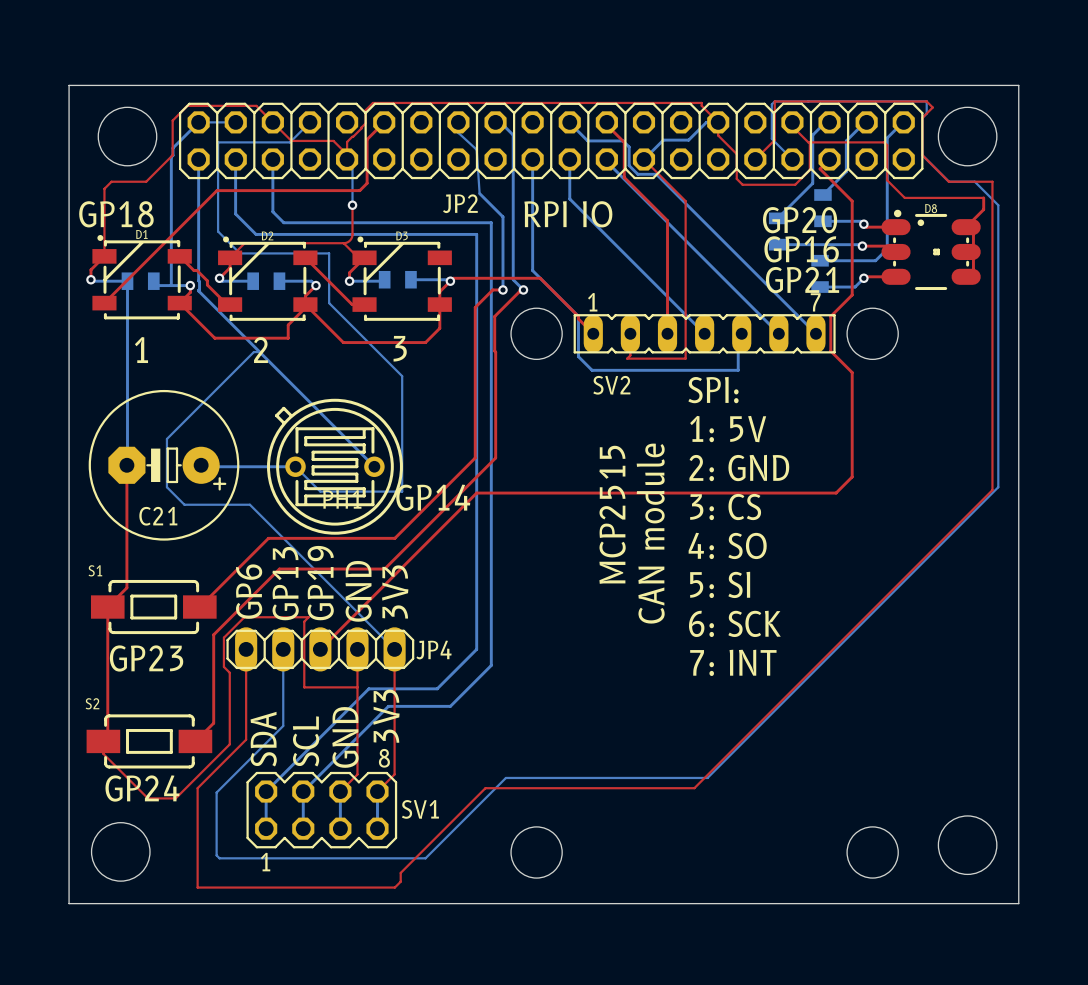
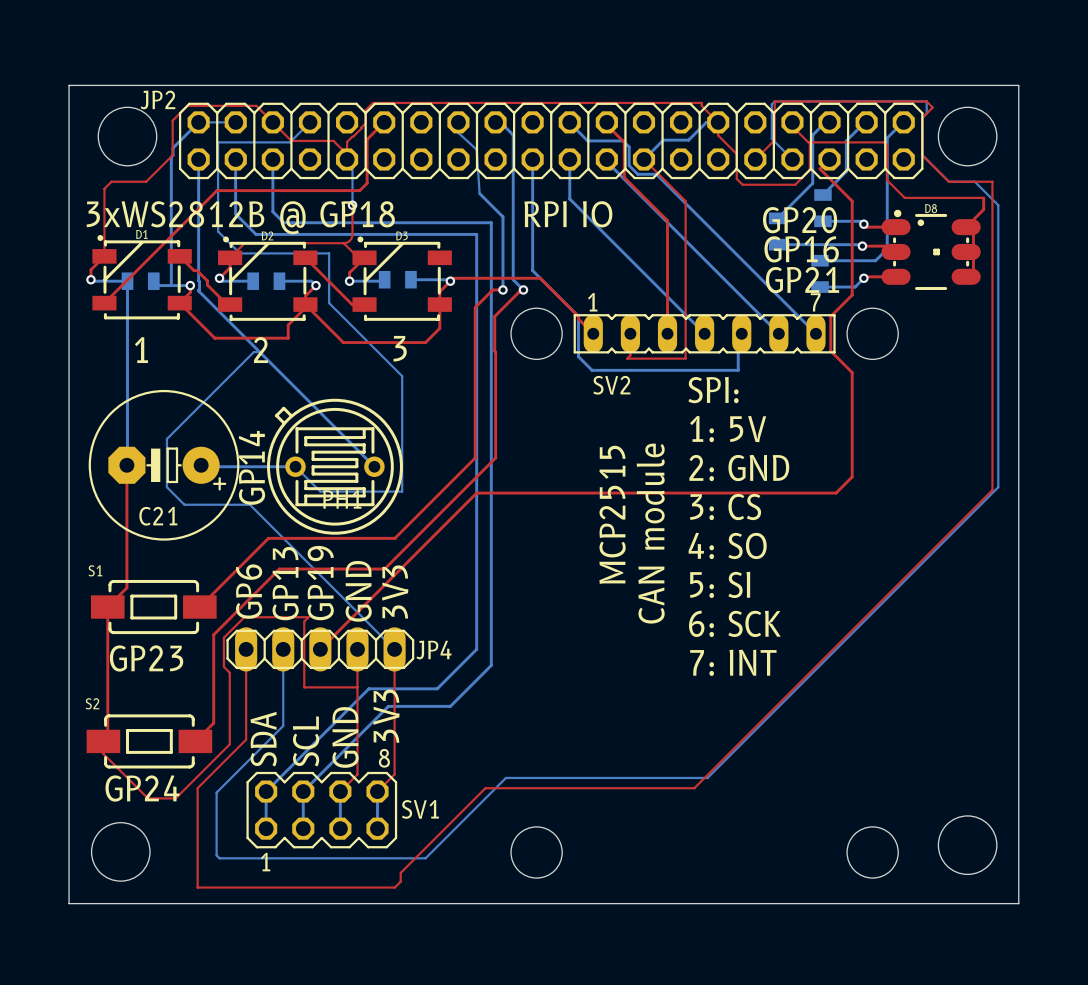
JP2 name position: JP2 (460, 203) -> JP2 (157, 99)
text: GP18 (116, 214) -> 3xWS2812B @ GP18 (240, 217)
text rotation: 0° (433, 497) -> 90° counterclockwise (251, 467)
text position: GP14 (433, 497) -> GP14 (251, 467)

